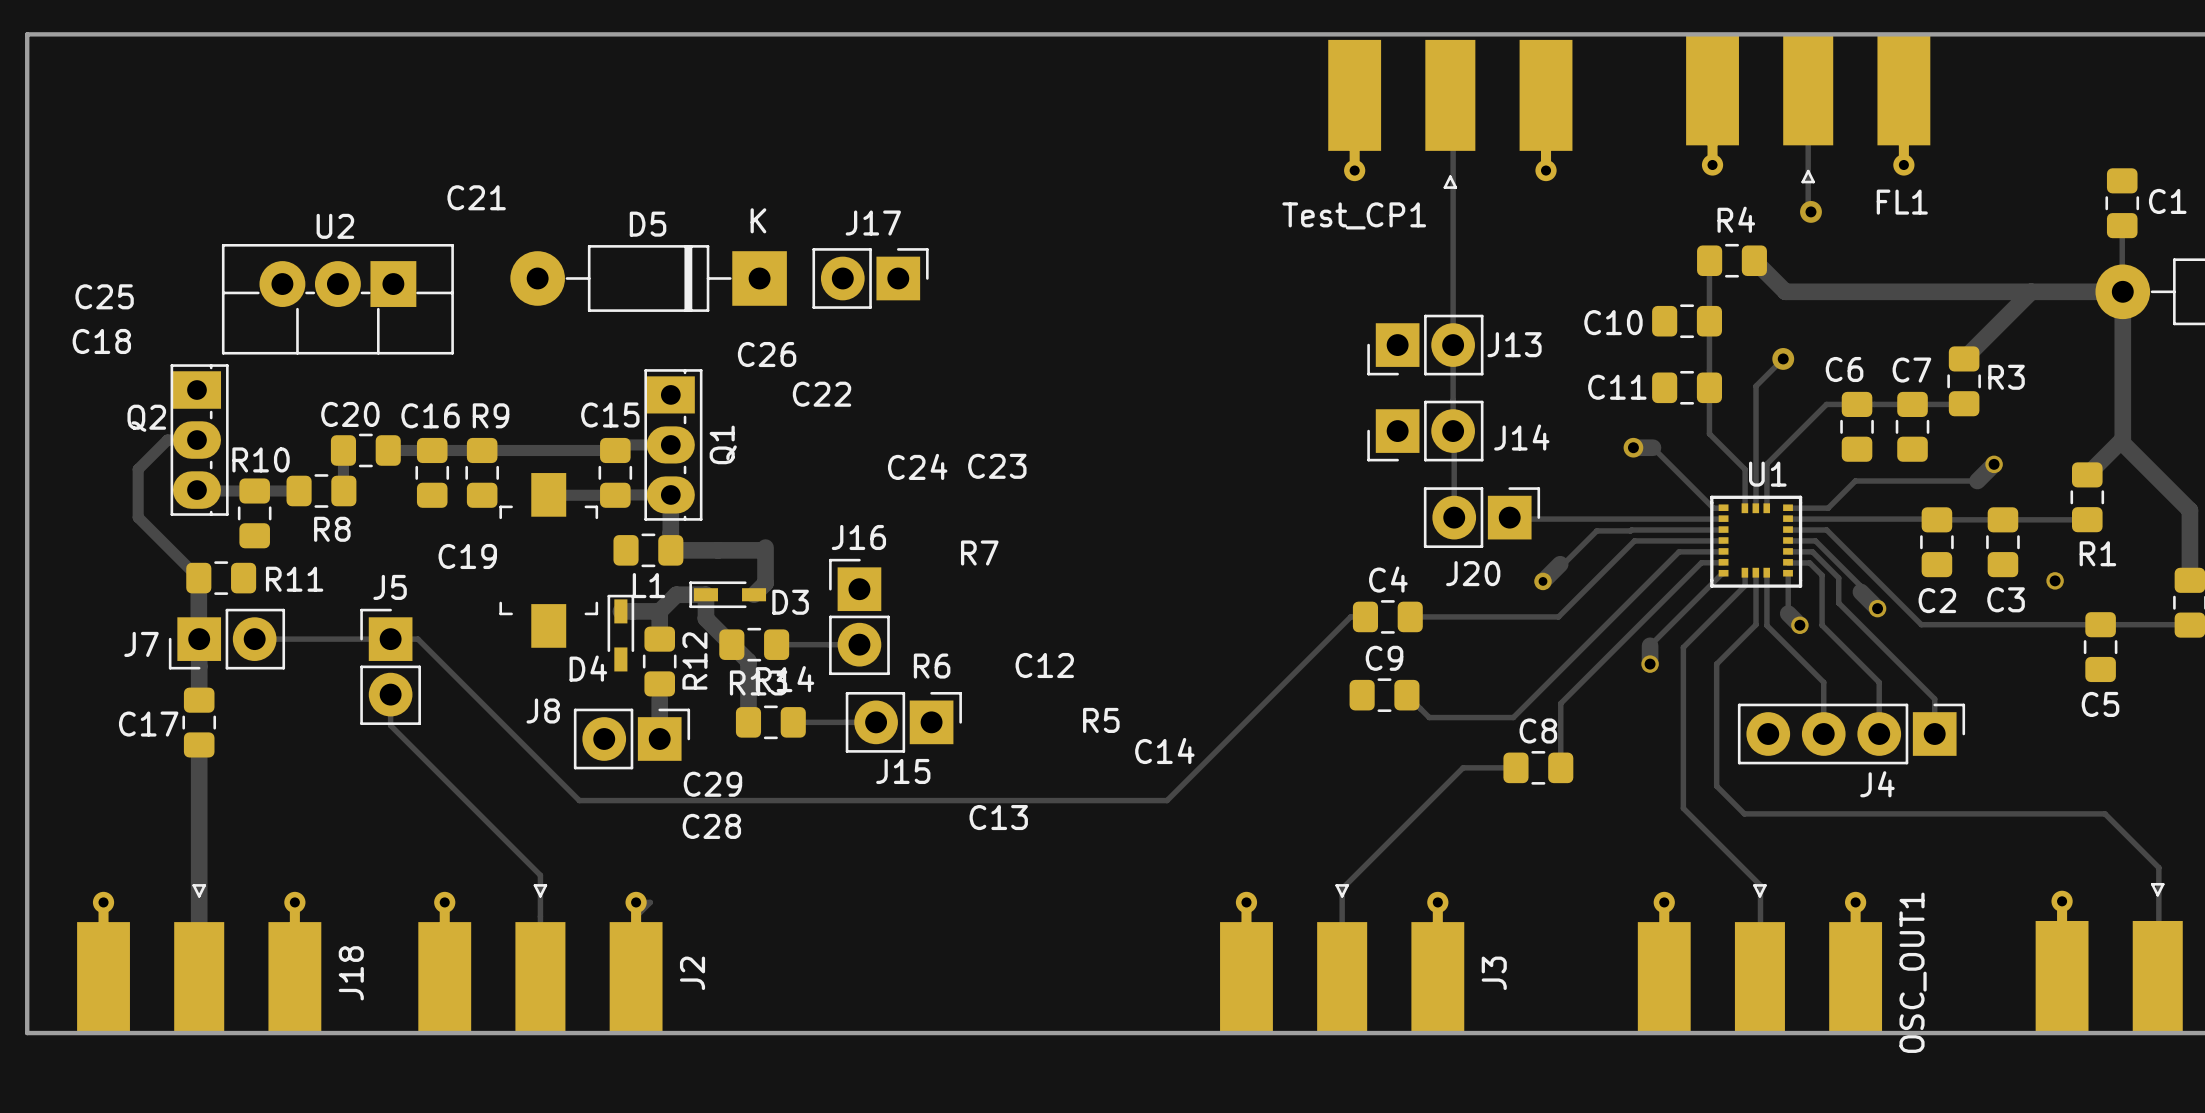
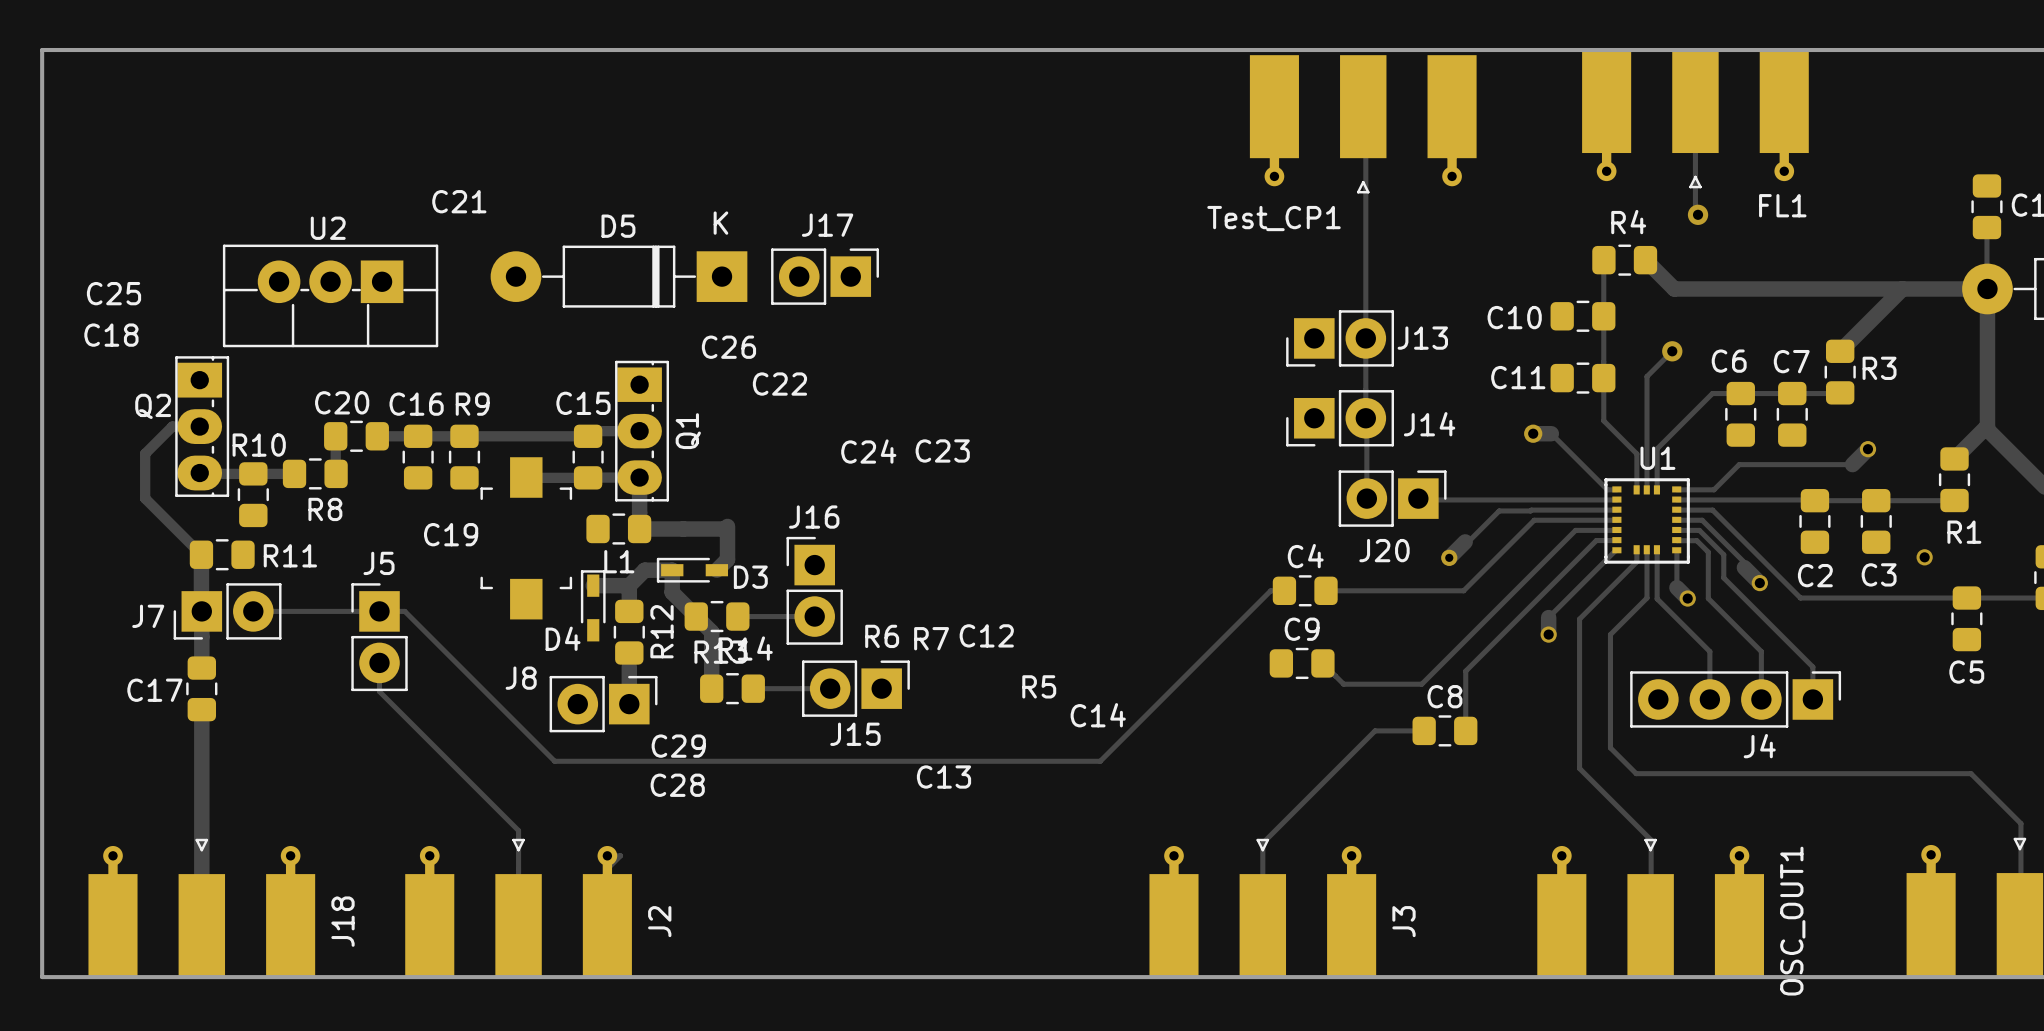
R7 position: (979, 552) -> (931, 638)

